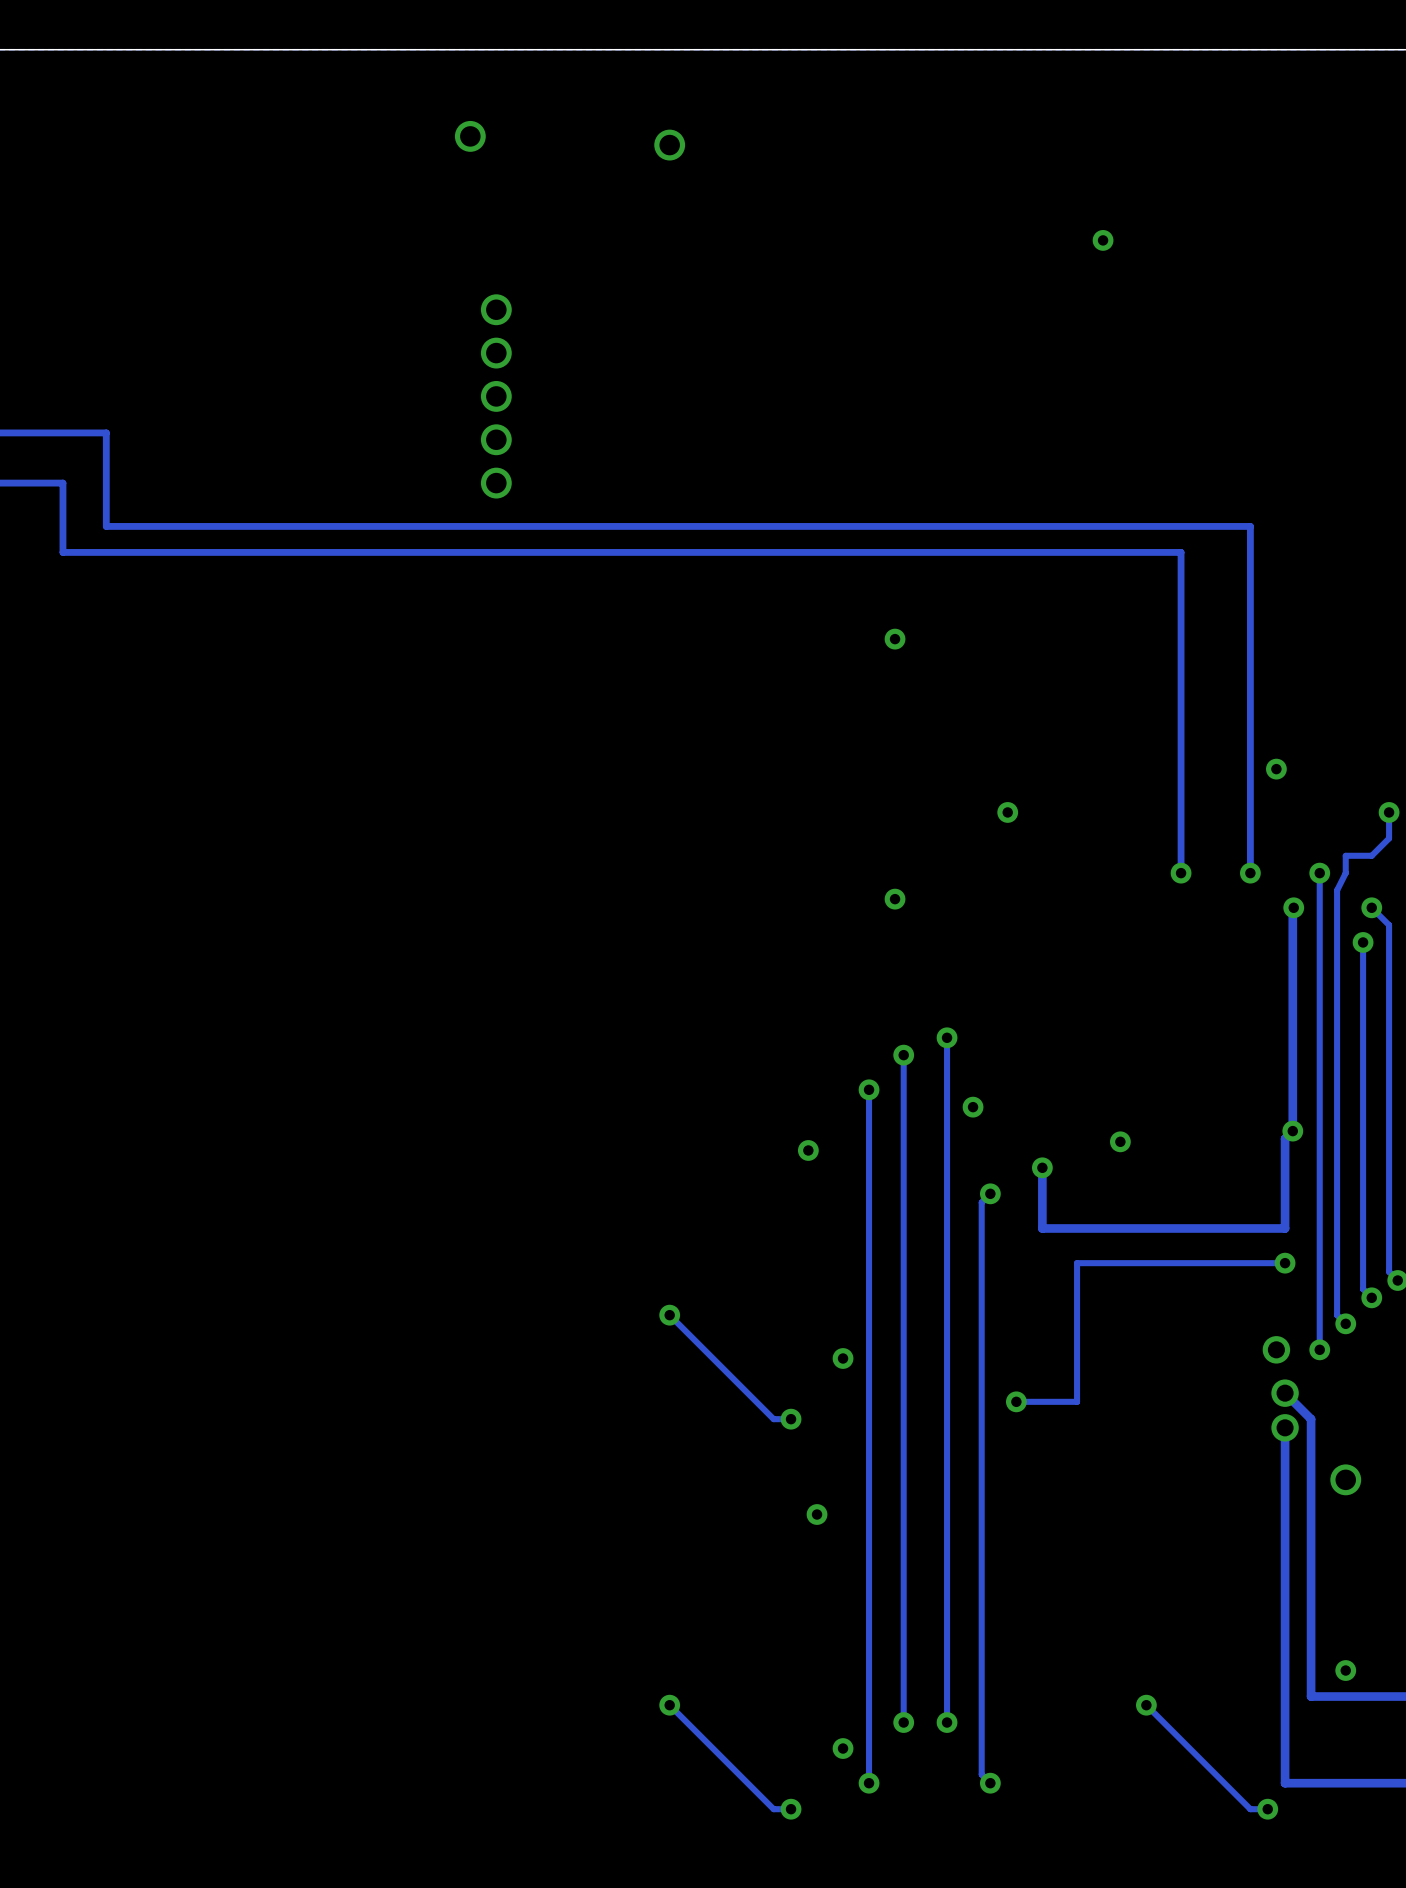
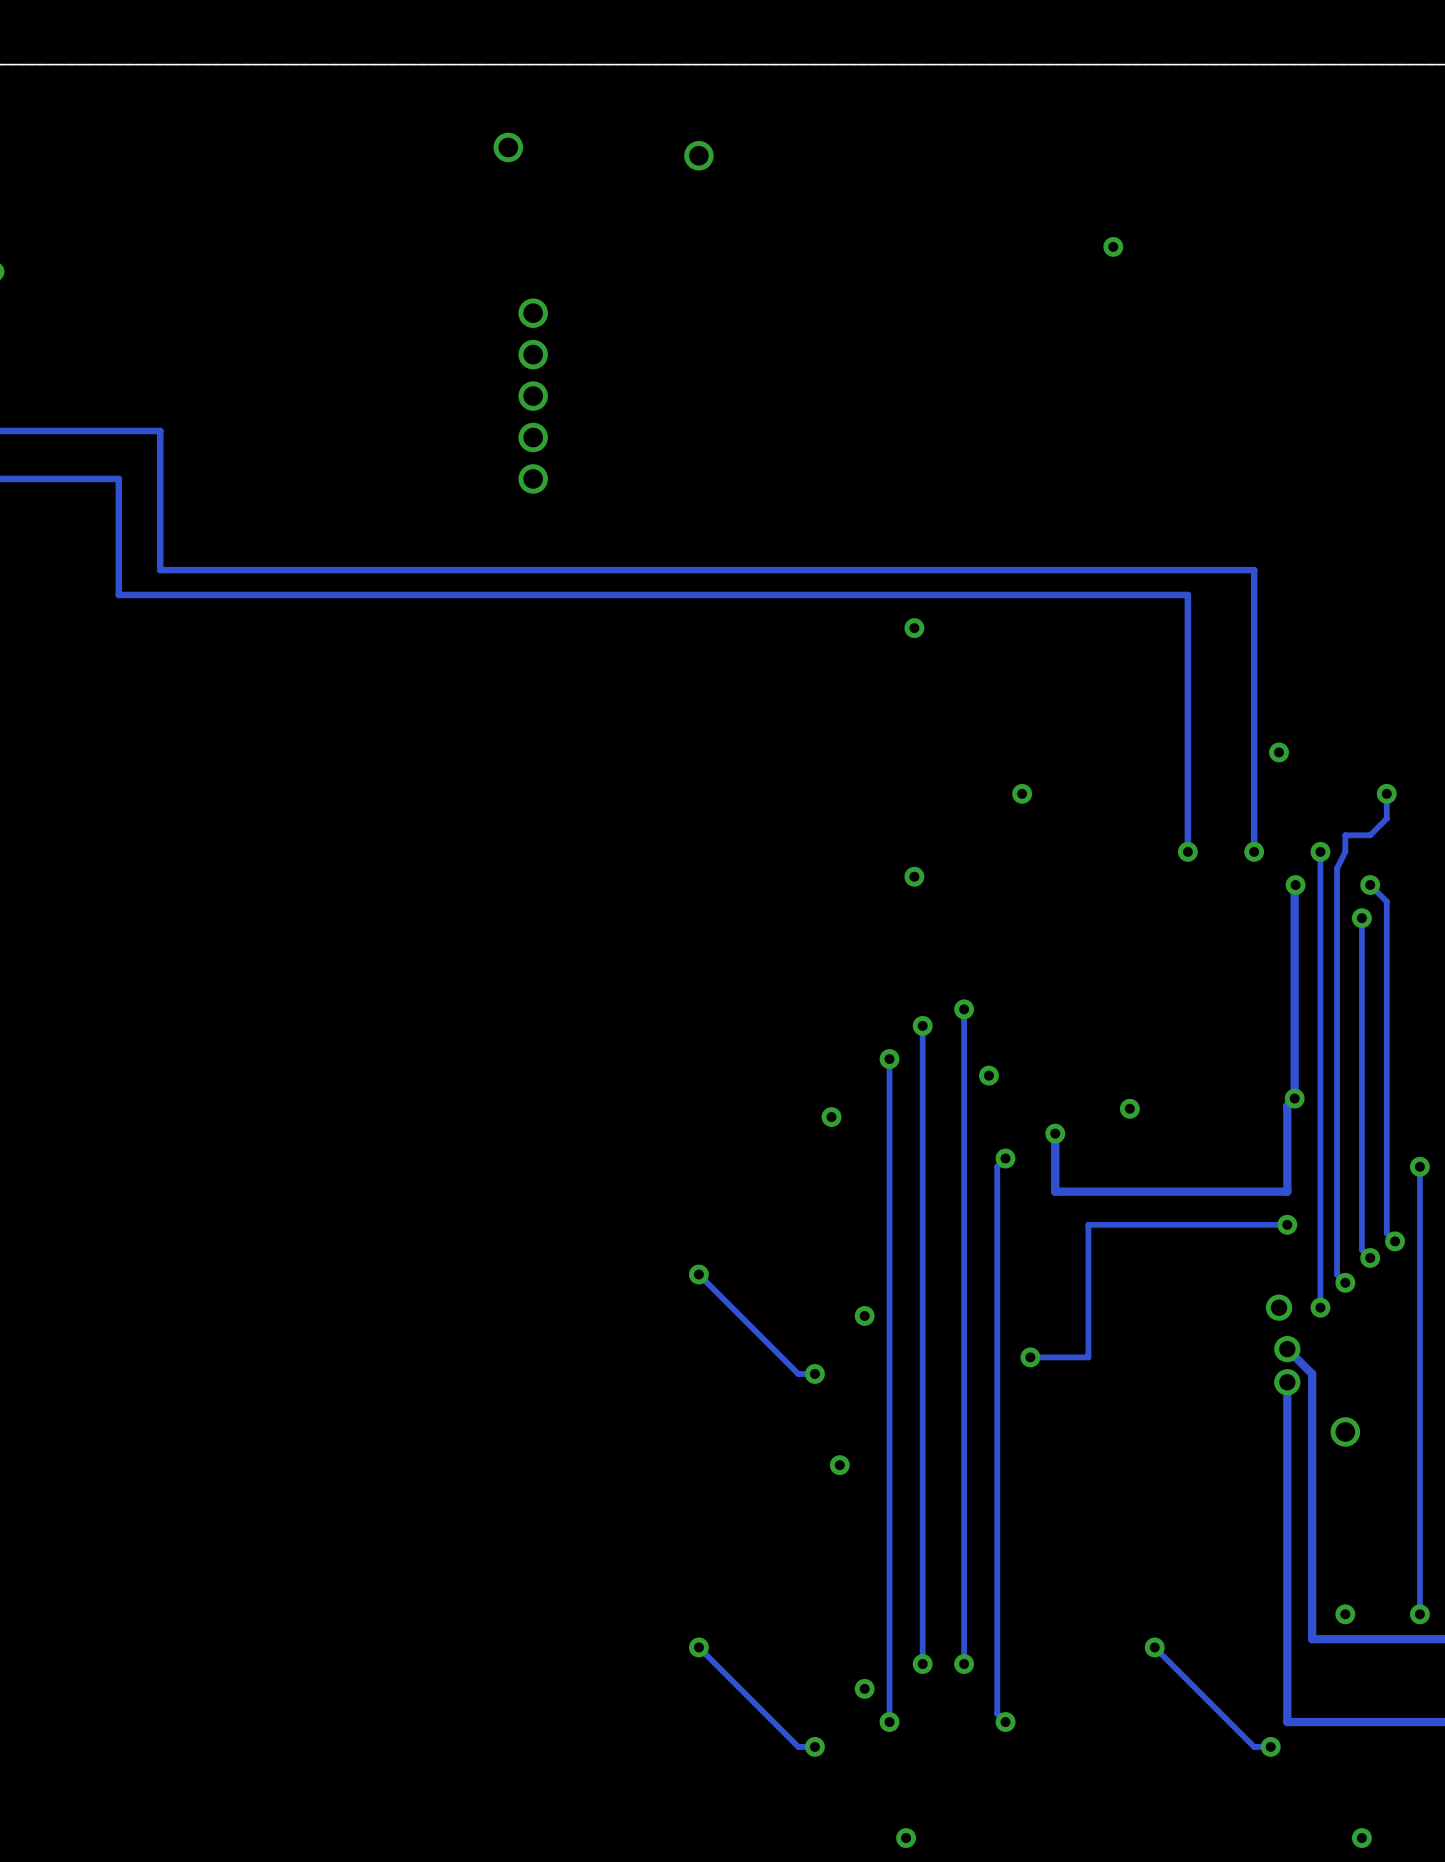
track: (106, 526) (1250, 526) (1250, 578) -> (160, 520) (160, 570) (1254, 570)
track: (62, 552) (1181, 552) (1181, 604) -> (118, 545) (118, 594) (1187, 594)

